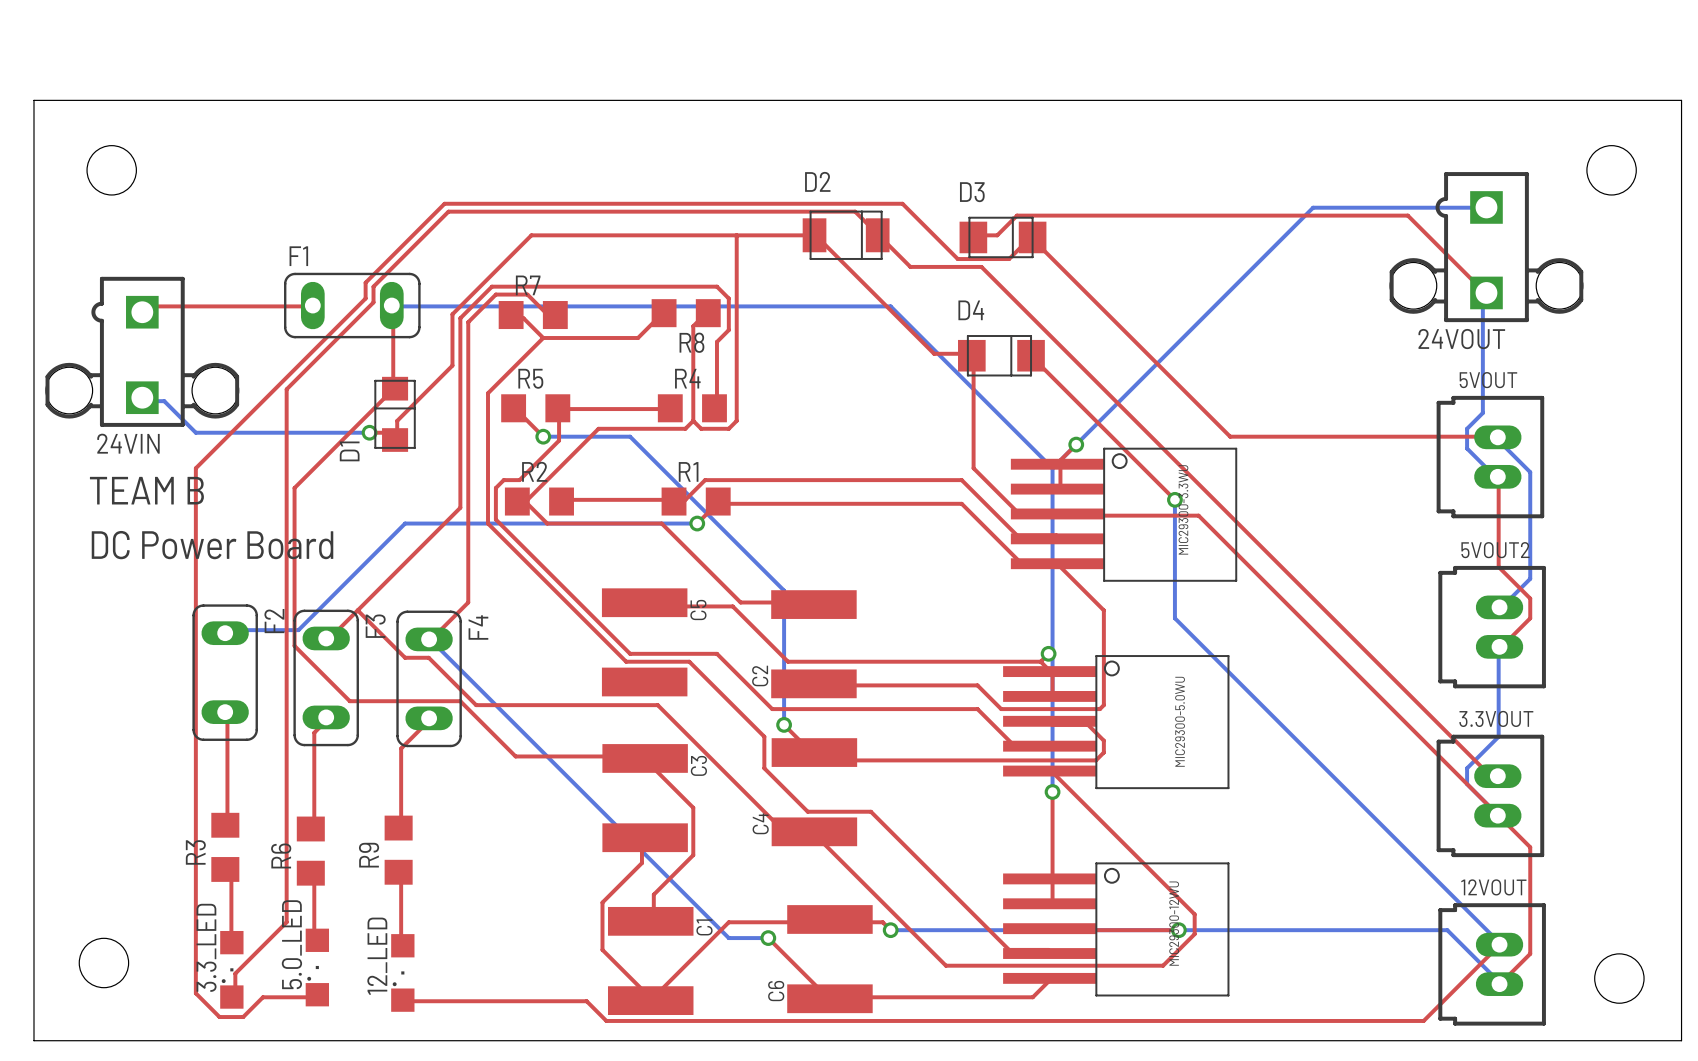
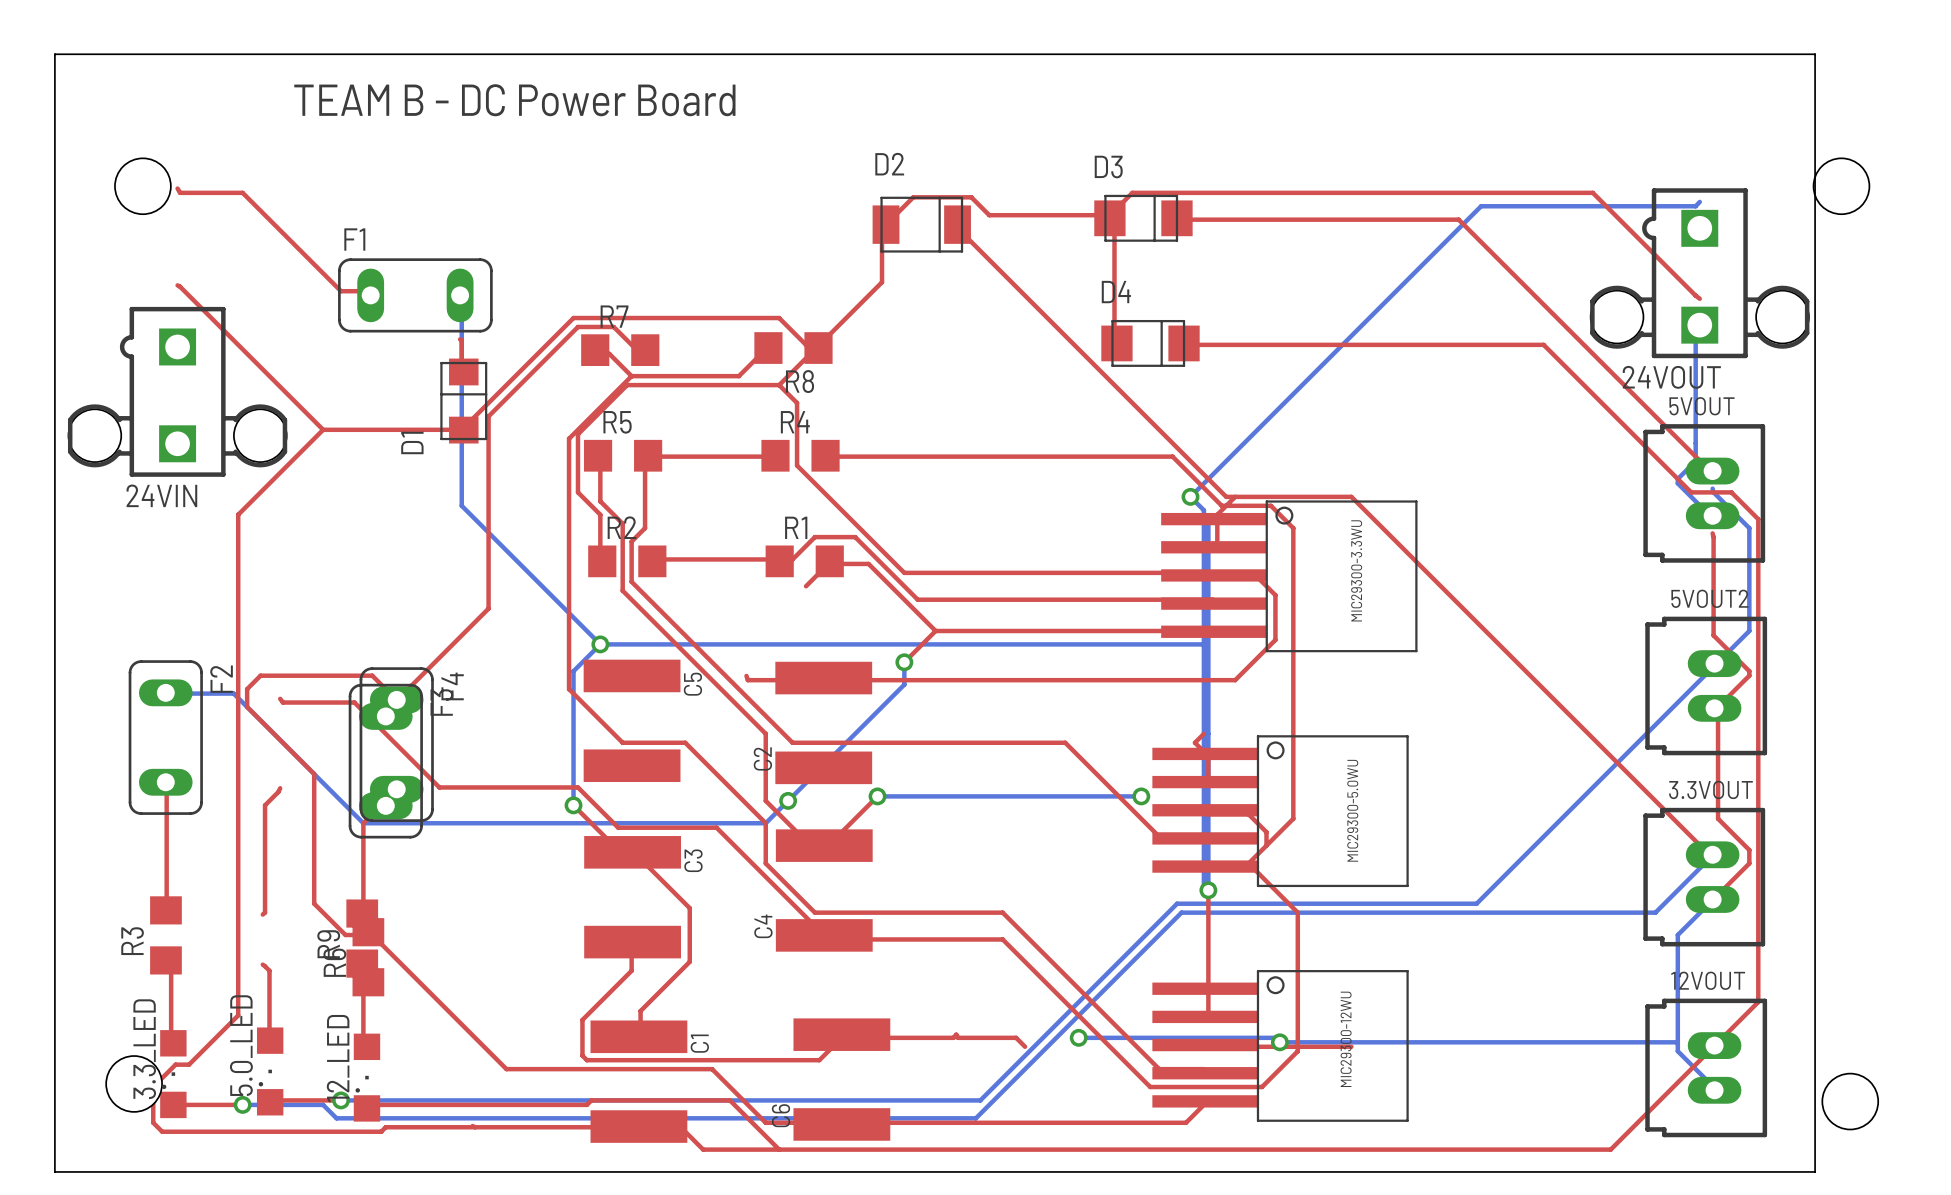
text: none -> TEAM B - DC Power Board (514, 100)
board edge: (33, 100) (1681, 100) (1681, 1040) (1588, 1040) -> (54, 107) (54, 54) (1815, 54) (1815, 1171)
top track: none -> (177, 188) (180, 192) (242, 192) (341, 291) (367, 291) (370, 295)
bottom track: none -> (1699, 201) (1695, 206) (1481, 206) (1190, 496) (1203, 510) (1203, 885)
top track: none -> (1109, 218) (1114, 224) (1114, 340) (1116, 343)
top track: none -> (1109, 218) (1110, 215) (1132, 192) (1592, 192) (1699, 298)
top track: none -> (1176, 218) (1458, 219) (1709, 470) (1712, 471)
top track: none -> (957, 224) (958, 228) (1226, 496) (1351, 496) (1709, 854) (1712, 854)
bottom track: (1486, 207) (1313, 207) (1052, 468) (890, 306) (391, 305) -> none
top track: (736, 235) (736, 420) (728, 428) (701, 428) -> none
D2 position: (846, 235) -> (921, 224)
top track: (973, 237) (973, 235) (997, 235) (1017, 215) (1407, 215) (1486, 292) -> none
D3 position: (1002, 237) -> (1143, 218)
top track: none -> (177, 285) (323, 429)
bottom track: none -> (460, 295) (461, 295) (461, 505) (600, 644)
top track: (673, 286) (716, 286) (728, 298) (728, 330) (716, 341) (716, 405) (714, 408) -> (779, 318) (806, 344) (814, 344) (818, 348) (819, 344) (882, 282) (882, 228) (913, 197) (971, 197) (989, 215) (1105, 215) (1109, 218)
top track: (312, 305) (148, 306) (142, 312) -> none
F1 position: (352, 305) -> (415, 295)
top track: (460, 318) (460, 507) (330, 638) (326, 638) -> (537, 353) (461, 429) (323, 429)
top track: (468, 322) (468, 602) (429, 639) -> (546, 358) (488, 416) (488, 608) (396, 699) (372, 675) (260, 675) (247, 689) (247, 707) (314, 774) (314, 903) (345, 935) (372, 935) (506, 1069) (712, 1069) (765, 1122) (841, 1122) (841, 1124) (846, 1122) (958, 1122)
top track: (693, 326) (693, 420) (685, 428) (598, 428) (555, 472) -> (648, 455) (645, 456) (645, 528)
top track: none -> (801, 362) (779, 385)
top track: (393, 334) (393, 385) (395, 388) (294, 488) (294, 645) (349, 701) (373, 701) -> (280, 698) (282, 702) (354, 702) (439, 787)
top track: none -> (779, 385) (797, 402) (797, 465) (801, 470)
top track: none -> (779, 385) (627, 385) (577, 434) (577, 492) (600, 514) (600, 559) (602, 561)
D4 position: (1001, 355) -> (1150, 343)
top track: (1031, 355) (1174, 499) -> none
bottom track: (142, 397) (144, 401) (164, 401) (195, 432) (369, 432) -> none
top track: none -> (825, 455) (1172, 456) (1221, 505) (1270, 505) (1293, 528) (1293, 818) (1266, 845)
top track: (515, 409) (543, 436) -> (600, 456) (600, 501) (622, 523) (622, 590) (765, 733) (765, 800) (810, 845) (828, 845) (877, 796)
top track: (559, 409) (559, 440) (519, 480) (503, 480) (495, 488) (495, 519) (630, 653) (716, 653) (772, 709) (977, 709) (1013, 744) -> none
D1 position: (395, 414) -> (463, 401)
top track: (369, 432) (397, 432) (395, 440) (397, 436) (397, 420) (452, 365) (452, 314) (531, 235) (815, 235) (934, 353) (969, 353) (973, 357) (973, 468) (1017, 511) -> (810, 478) (904, 572) (1168, 572)
via: (369, 432) -> none
bottom track: (1467, 432) (1467, 448) (1494, 476) (1497, 476) -> (1677, 483) (1709, 514) (1712, 515)
bottom track: (543, 436) (630, 436) (784, 590) -> none
via: (543, 436) -> none
top track: (1497, 437) (1230, 436) (1032, 237) (1009, 259) (957, 259) (902, 203) (444, 203) (365, 282) (365, 298) (195, 468) -> (323, 429) (238, 514) (238, 523)
via position: (1076, 444) -> (1190, 496)
5VOUT position: (1490, 457) -> (1704, 493)
top track: (740, 480) (961, 480) (1017, 535) -> (855, 537) (917, 599) (1168, 599)
top track: (543, 484) (527, 499) (519, 499) (517, 501) (523, 499) (543, 519) -> (631, 541) (631, 581)
text: TEAM B (146, 490) -> none
bottom track: (1174, 499) (1174, 618) (1499, 944) -> none
via: (1174, 499) -> none
top track: (752, 503) (961, 503) (1020, 563) -> (935, 630) (1172, 630)
top track: none -> (868, 563) (935, 630)
top track: (1095, 515) (1198, 515) (1530, 847) (1530, 953) (1499, 984) -> (1257, 577) (1275, 595) (1275, 639) (1235, 680) (846, 680)
top track: (488, 523) (626, 661) (685, 661) -> (636, 586) (792, 742)
top track: (547, 523) (661, 523) (740, 602) (811, 602) (813, 604) -> none
bottom track: (697, 523) (405, 523) (298, 630) (227, 630) (225, 633) -> none
via: (697, 523) -> none
text: DC Power Board (212, 545) -> none
top track: none -> (935, 630) (904, 662)
top track: (1057, 563) (1103, 610) (1103, 705) (1099, 709) (1001, 709) (977, 685) (815, 685) (813, 683) -> none
bottom track: (1530, 563) (1530, 578) (1499, 607) -> (1749, 630) (1714, 663) (1713, 666) (1476, 903) (1177, 903) (980, 1100) (341, 1100)
bottom track: none -> (600, 644) (573, 671) (573, 805)
bottom track: none -> (600, 644) (1203, 644)
via: none -> (600, 644)
via: none -> (904, 662)
top track: (1530, 602) (1530, 618) (1499, 646) -> (1749, 675) (1714, 708) (1718, 711) (1718, 818) (1749, 850) (1749, 863) (1712, 899)
top track: (732, 606) (788, 661) -> (797, 742) (908, 742)
top track: (357, 610) (405, 657) (428, 657) (476, 705) (657, 705) (784, 831) (814, 831) (815, 835) (945, 965) (1001, 965) -> (537, 787) (577, 787) (618, 827) (716, 827) (828, 939) (1002, 939) (1150, 1087)
bottom track: (784, 610) (784, 724) -> (904, 684) (765, 823) (363, 823) (233, 693) (165, 692)
5VOUT2 position: (1492, 627) -> (1706, 685)
bottom track: (429, 639) (728, 938) (768, 938) -> none
C5 position: (644, 642) -> (632, 720)
C2 position: (813, 644) -> (823, 722)
bottom track: (1499, 646) (1498, 736) (1467, 768) (1467, 784) (1497, 815) -> none
via position: (1048, 653) -> (1141, 796)
top track: (689, 661) (764, 736) (764, 768) (807, 811) -> (569, 586) (569, 689) (622, 742) (685, 742) (765, 823) (765, 863) (814, 912) (931, 912)
top track: (926, 661) (1040, 661) -> (1065, 742) (1159, 836) (1163, 836)
F2 position: (225, 672) -> (165, 737)
F4 position: (429, 678) -> (396, 744)
top track: none -> (165, 782) (165, 910)
top track: none -> (280, 788) (265, 805) (265, 912) (262, 914)
top track: (460, 701) (515, 756) (531, 756) -> (573, 805) (618, 850)
top track: none -> (396, 789) (363, 823) (362, 913)
bottom track: none -> (877, 796) (1141, 796)
top track: (225, 712) (227, 713) (227, 823) (225, 825) -> none
via: none -> (788, 800)
via: none -> (573, 805)
top track: (326, 717) (326, 720) (314, 732) (314, 827) (310, 828) -> none
top track: (429, 718) (428, 720) (401, 748) (401, 827) (398, 828) -> none
top track: (784, 724) (811, 752) (814, 752) (819, 760) (1095, 760) -> (1248, 863) (1257, 854)
via position: (784, 724) -> (877, 796)
top track: (543, 756) (641, 756) (693, 807) (693, 855) (653, 894) (653, 918) (650, 921) -> (631, 850) (689, 908) (689, 961) (640, 1011) (638, 1036)
bottom track: none -> (1712, 854) (1655, 912) (1181, 912) (975, 1118) (336, 1118) (323, 1104) (242, 1104)
top track: (1049, 771) (1194, 914) (1194, 934) (1163, 965) (1099, 965) -> (1248, 863) (1297, 912) (1297, 1051) (1262, 1087)
top track: (1497, 776) (1494, 772) (1486, 772) (981, 266) (910, 266) (855, 211) (448, 211) (373, 286) (373, 302) (286, 389) (286, 922) (235, 973) (235, 993) (231, 997) -> none
C4 position: (814, 792) -> (824, 890)
3.3VOUT position: (1490, 795) -> (1704, 877)
C3 position: (645, 798) -> (632, 897)
bottom track: none -> (1712, 899) (1677, 935) (1677, 1051) (1713, 1087) (1714, 1090)
top track: none -> (632, 942) (631, 970) (582, 1019) (582, 1055) (586, 1060) (819, 1060)
top track: (645, 837) (641, 839) (641, 863) (602, 902) (602, 949) (630, 977) -> (366, 1108) (367, 1104) (586, 1104) (591, 1100) (730, 1100)
R3 position: (225, 847) -> (165, 935)
R9 position: (398, 850) -> (362, 938)
top track: none -> (165, 960) (171, 966) (171, 1042) (173, 1043)
top track: none -> (362, 963) (363, 1046) (366, 1046)
top track: none -> (262, 964) (269, 970) (270, 1040)
top track: (225, 869) (231, 874) (231, 942) -> none
top track: (398, 872) (401, 874) (401, 942) (402, 945) -> none
top track: (310, 873) (314, 874) (314, 938) (317, 940) -> none
top track: (195, 902) (195, 993) (219, 1017) (243, 1017) (262, 997) (314, 997) (317, 994) -> (238, 1015) (189, 1064) (175, 1064) (153, 1087) (153, 1122) (162, 1131) (381, 1131) (385, 1127) (475, 1127)
bottom track: none -> (1078, 1037) (1275, 1037) (1279, 1042) (1677, 1042)
bottom track: (890, 930) (1447, 930) (1499, 984) -> none
via position: (890, 930) -> (1078, 1037)
via position: (1178, 930) -> (1279, 1042)
top track: (768, 938) (827, 997) (831, 997) -> none
via: (768, 938) -> none
top track: (709, 942) (650, 1000) (649, 997) -> (779, 1149) (752, 1122)
top track: (1499, 944) (1423, 1020) (1407, 1020) -> (1184, 343) (1543, 344) (1691, 492) (1731, 492) (1758, 519) (1758, 1002) (1610, 1149)
C6 position: (829, 959) -> (841, 1079)
C1 position: (650, 960) -> (638, 1081)
12VOUT position: (1492, 964) -> (1706, 1067)
5.0_LED position: (317, 967) -> (270, 1071)
3.3_LED position: (231, 969) -> (173, 1074)
12_LED position: (402, 972) -> (366, 1077)
top track: none -> (341, 1100) (273, 1100) (270, 1102)
via: none -> (341, 1100)
top track: none -> (173, 1104) (242, 1104)
via: none -> (242, 1104)

